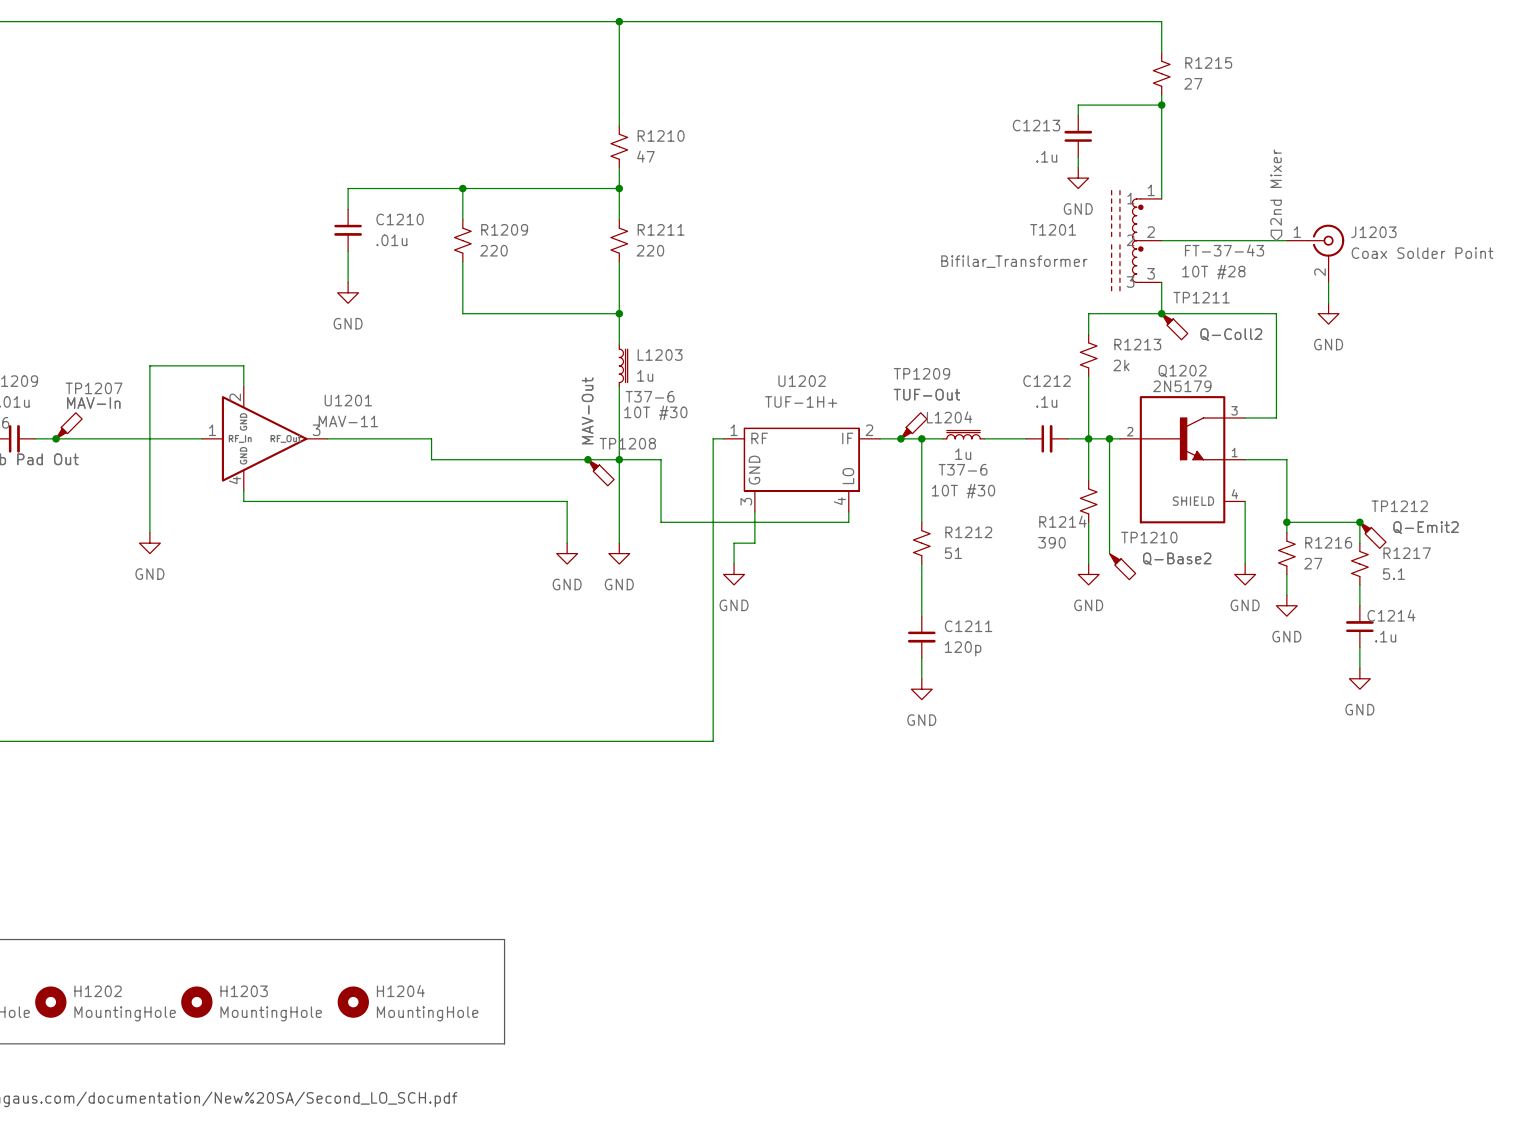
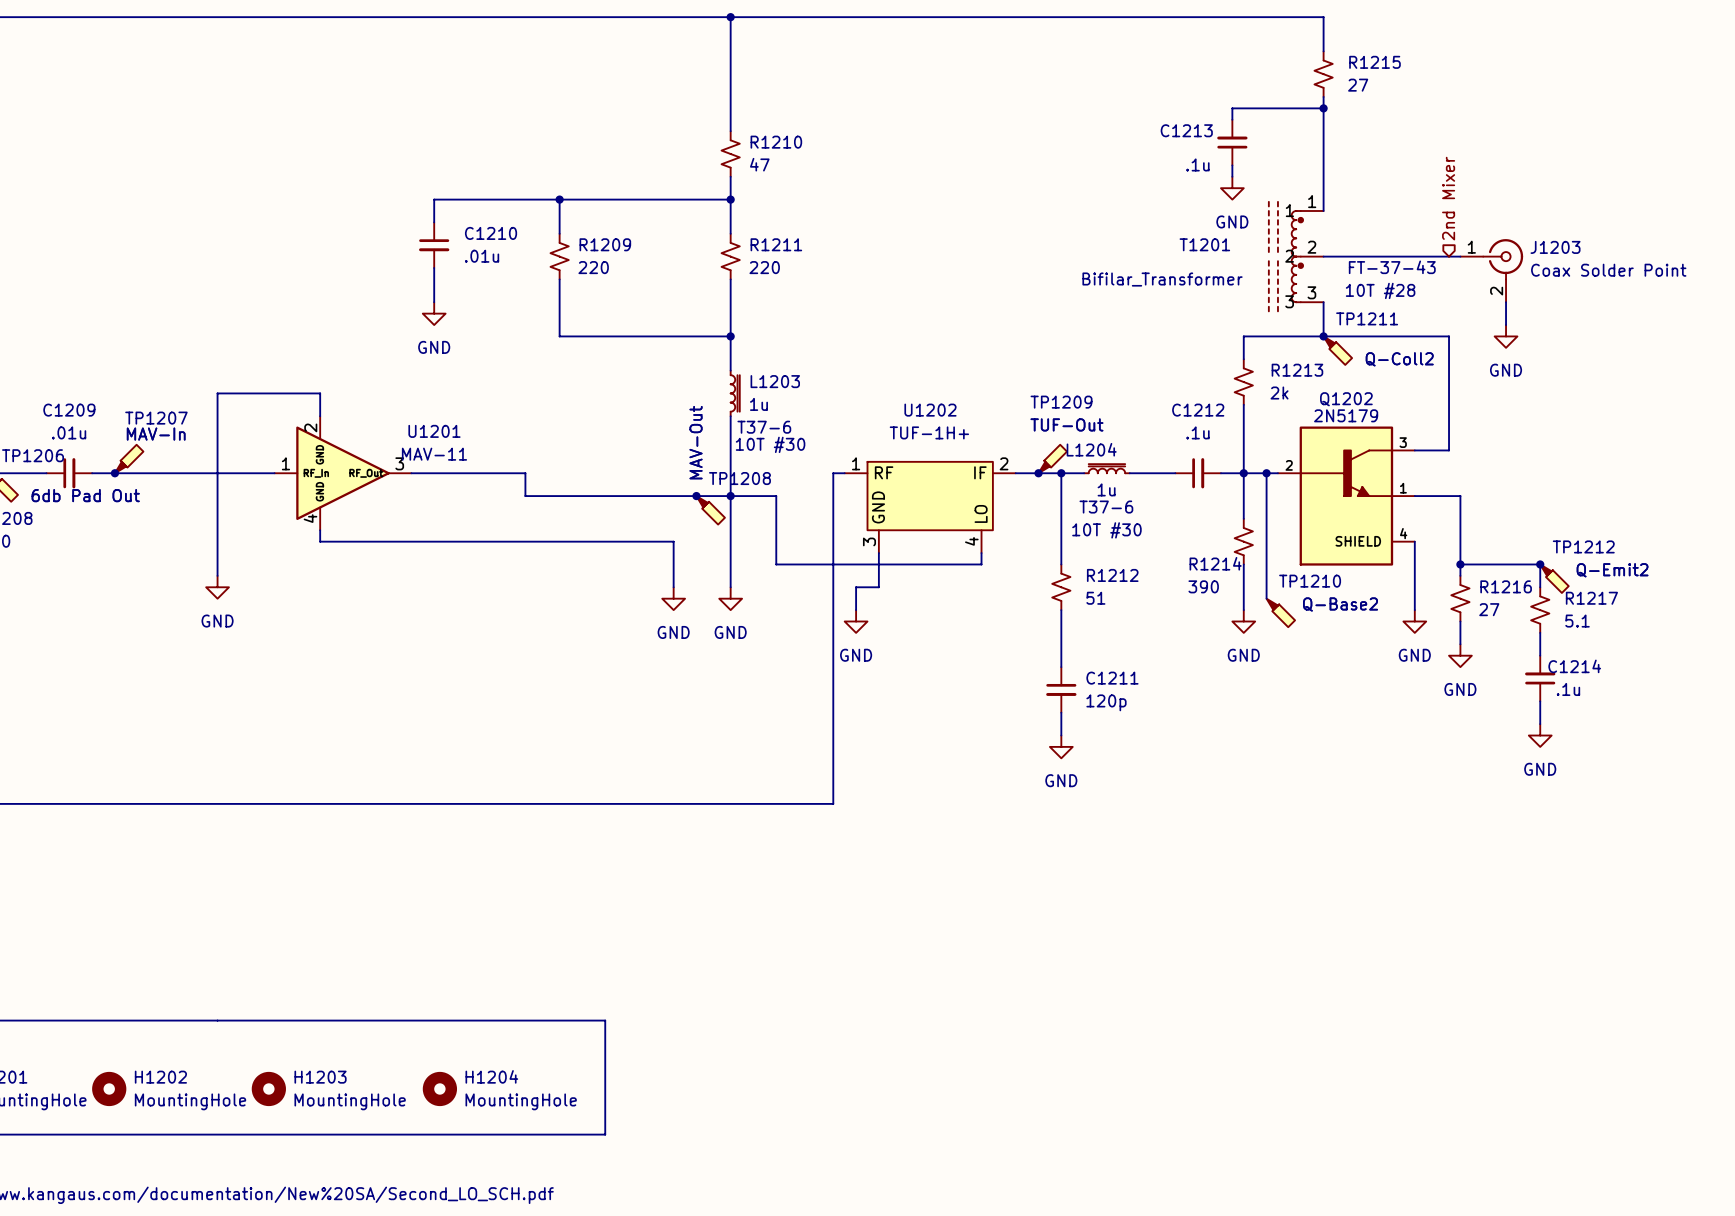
U1202 symbol: [723, 428, 881, 512] -> [844, 461, 1016, 554]

